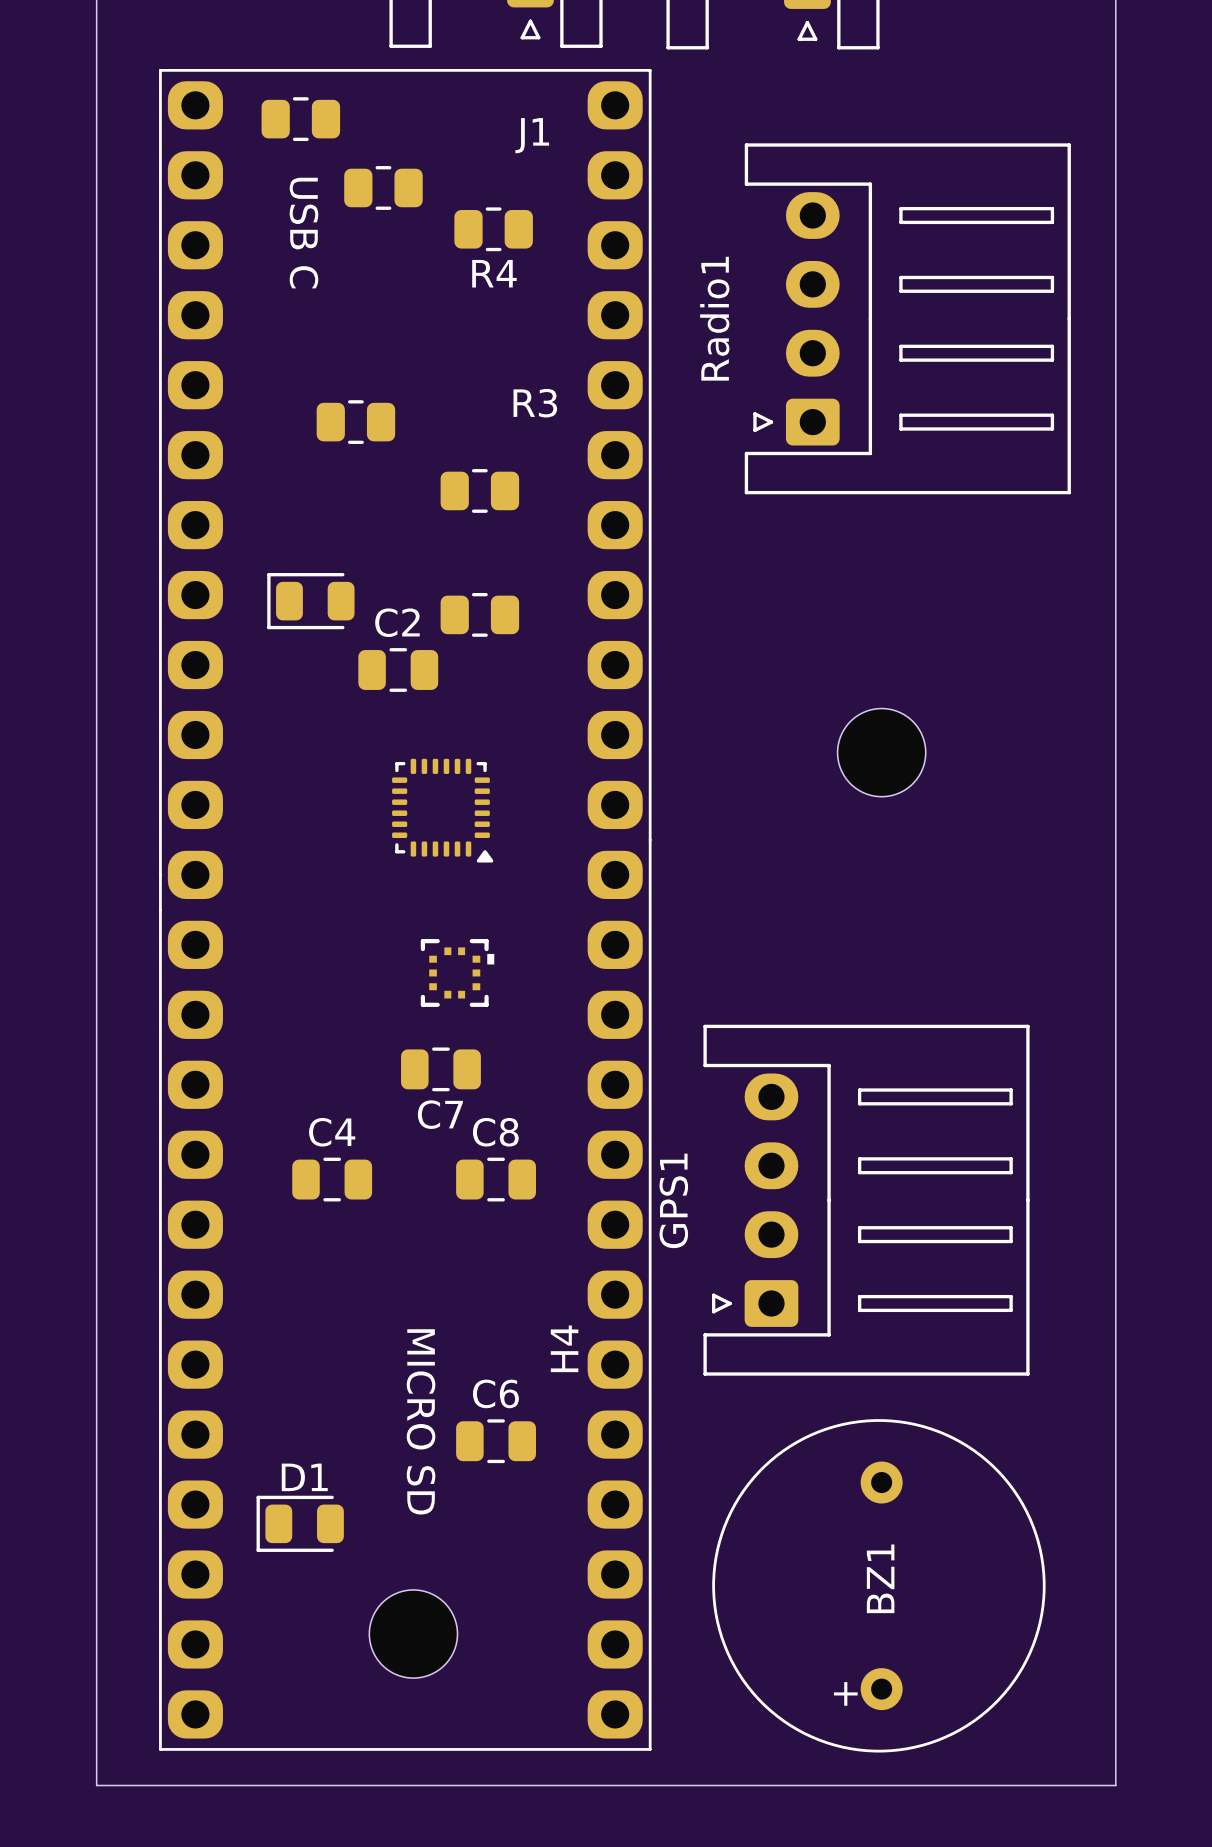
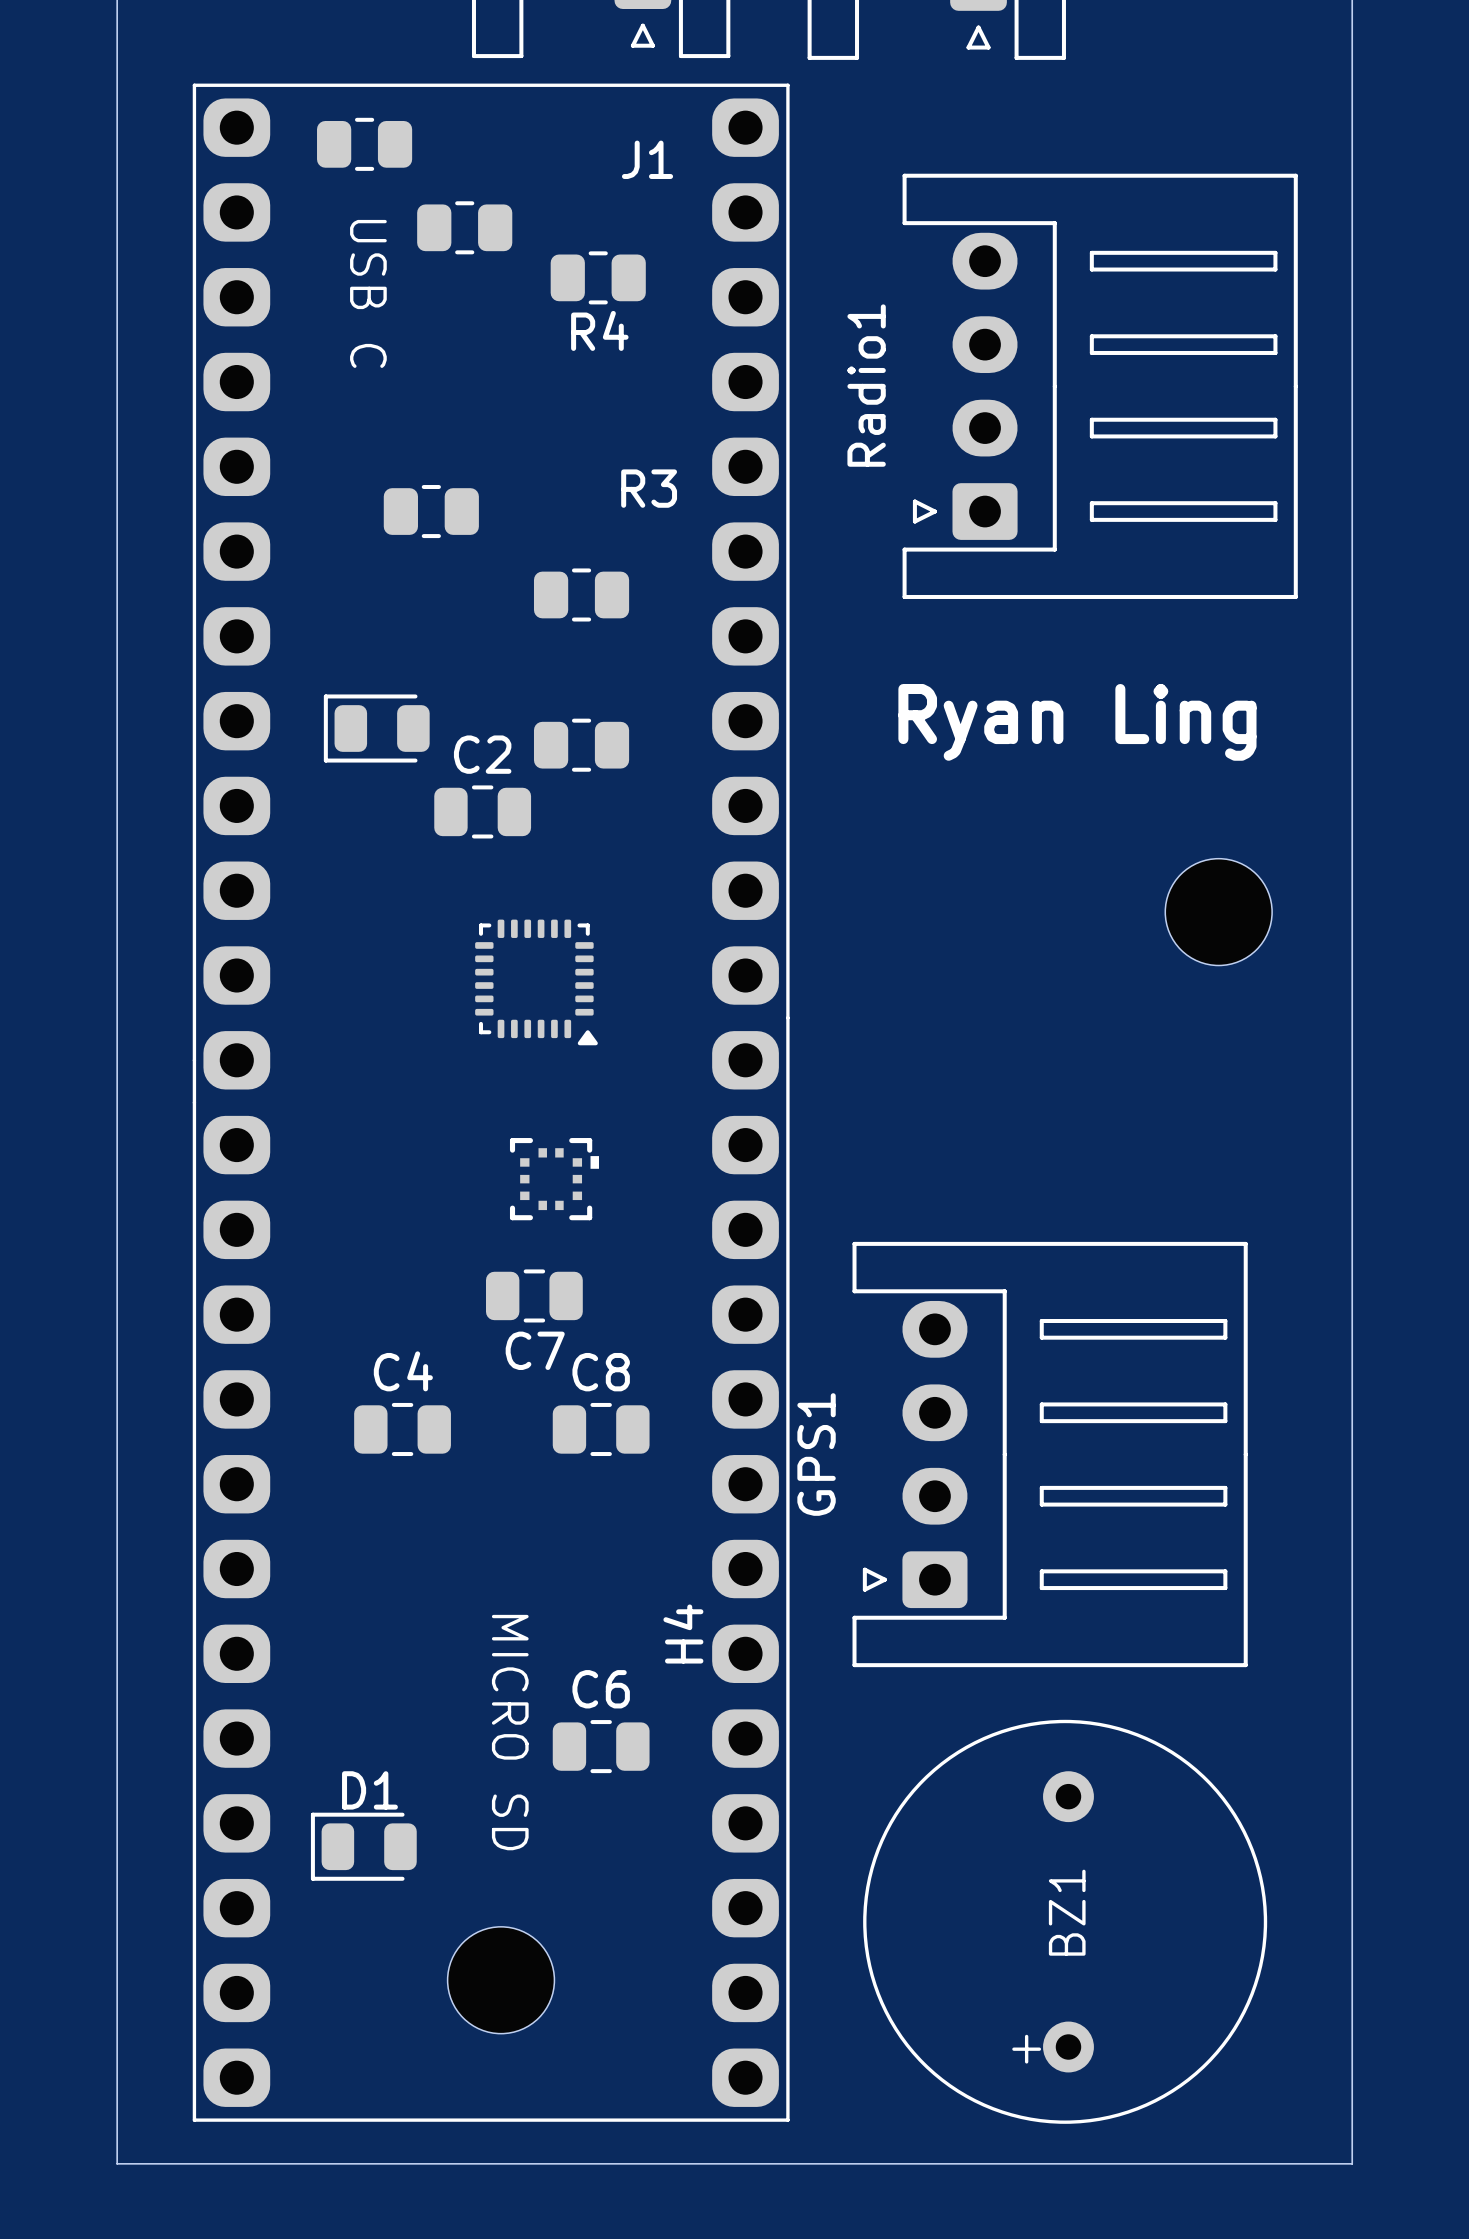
text: none -> Ryan Ling (1077, 722)
part position: (881, 752) -> (1218, 912)

